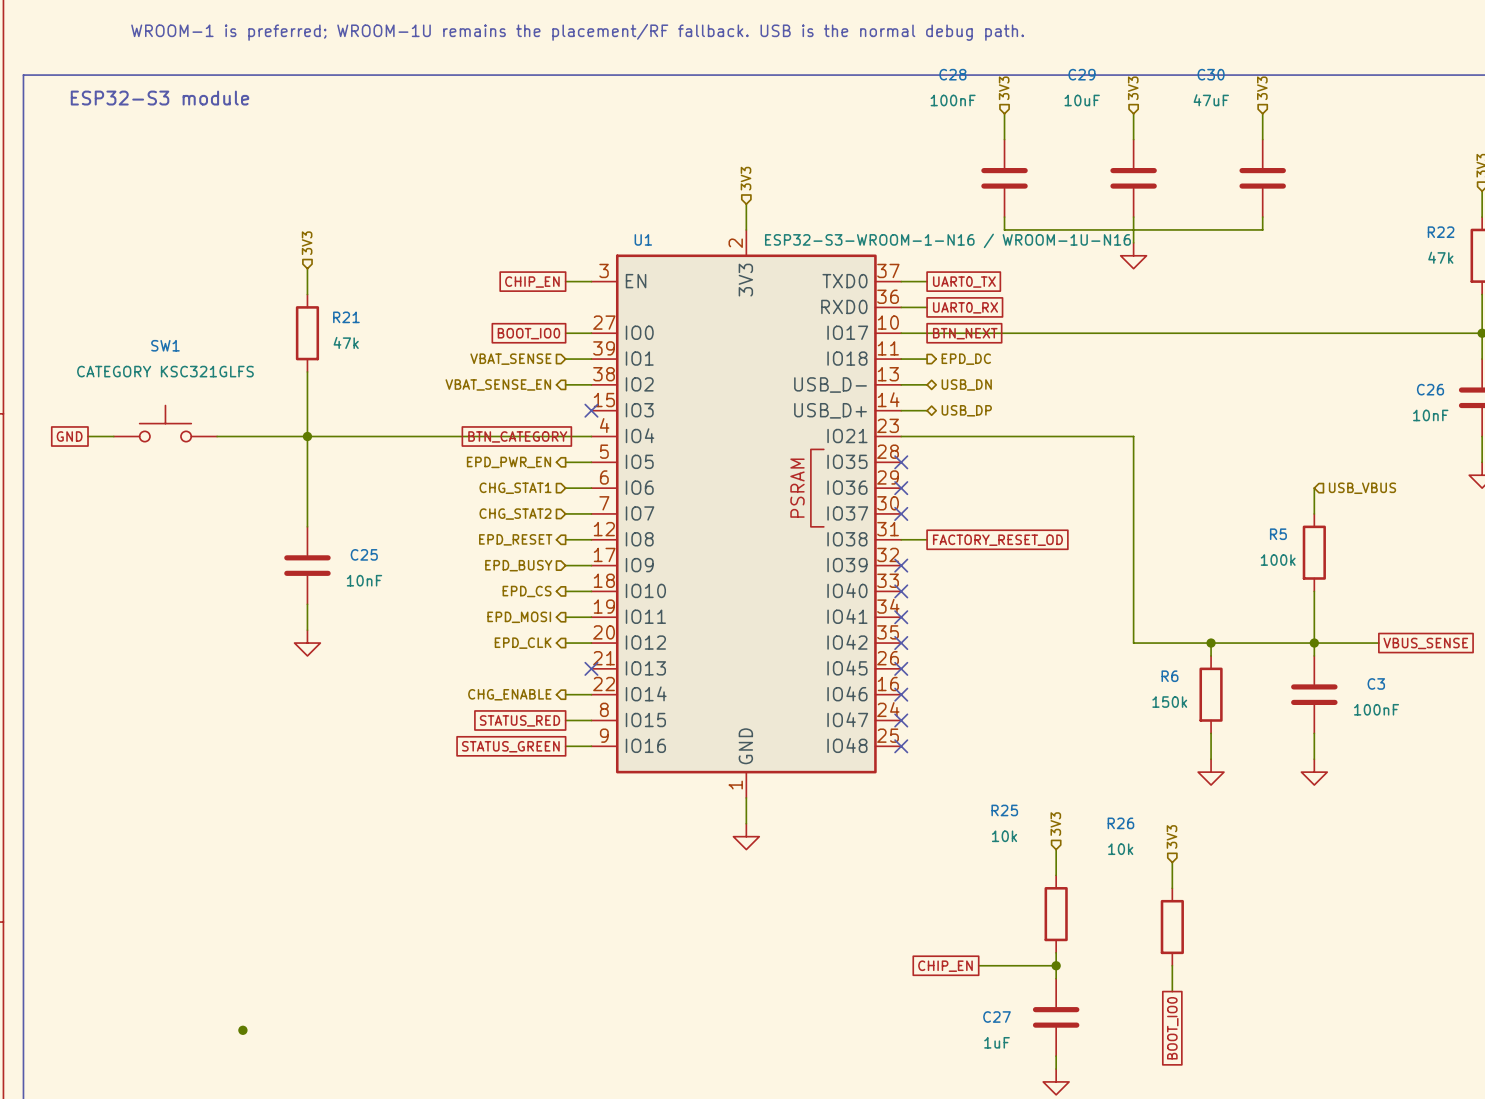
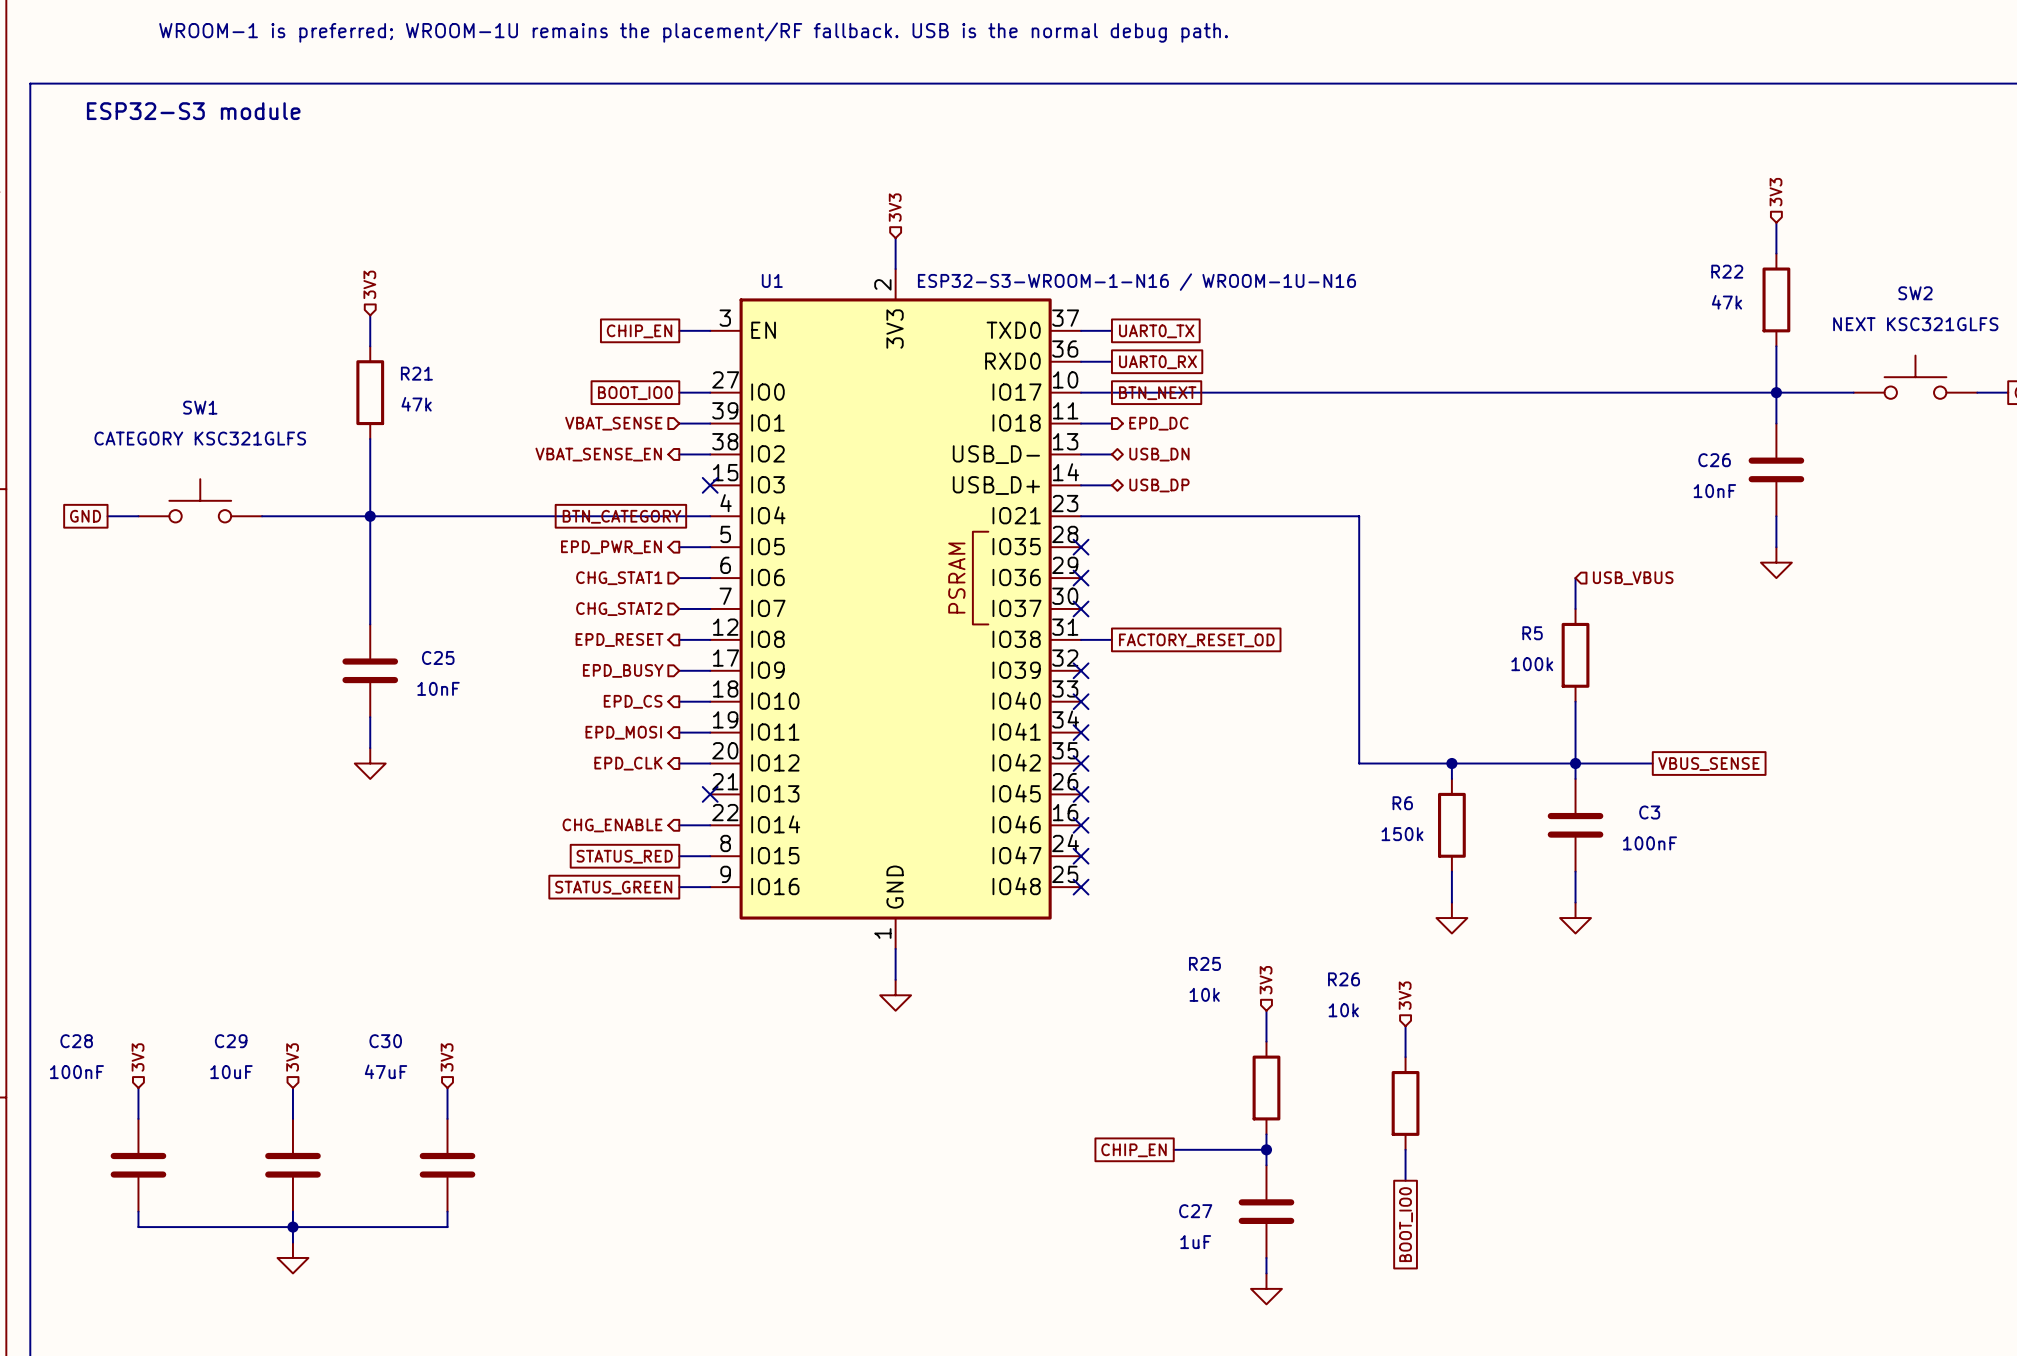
hierarchical label: 3V3 (1004, 88) -> none
hierarchical label: 3V3 (1133, 88) -> none
hierarchical label: 3V3 (1262, 88) -> none
wire: (1004, 113) (1004, 139) -> none
wire: (1133, 113) (1133, 139) -> none
wire: (1262, 113) (1262, 139) -> none
C28 position: (1004, 178) -> (138, 1165)
C29 position: (1133, 178) -> (292, 1165)
C30 position: (1262, 178) -> (447, 1165)
wire: (1004, 217) (1004, 229) (1262, 229) (1262, 217) -> none
wire: (1133, 217) (1133, 242) -> none
power symbol: (1133, 255) -> none
hierarchical label: none -> 3V3 (138, 1057)
hierarchical label: none -> 3V3 (292, 1057)
hierarchical label: none -> 3V3 (447, 1057)
wire: none -> (138, 1088) (138, 1118)
wire: none -> (292, 1088) (292, 1118)
wire: none -> (447, 1088) (447, 1118)
wire: none -> (138, 1211) (138, 1227) (447, 1227) (447, 1211)
wire: none -> (292, 1211) (292, 1242)
power symbol: none -> (292, 1257)

